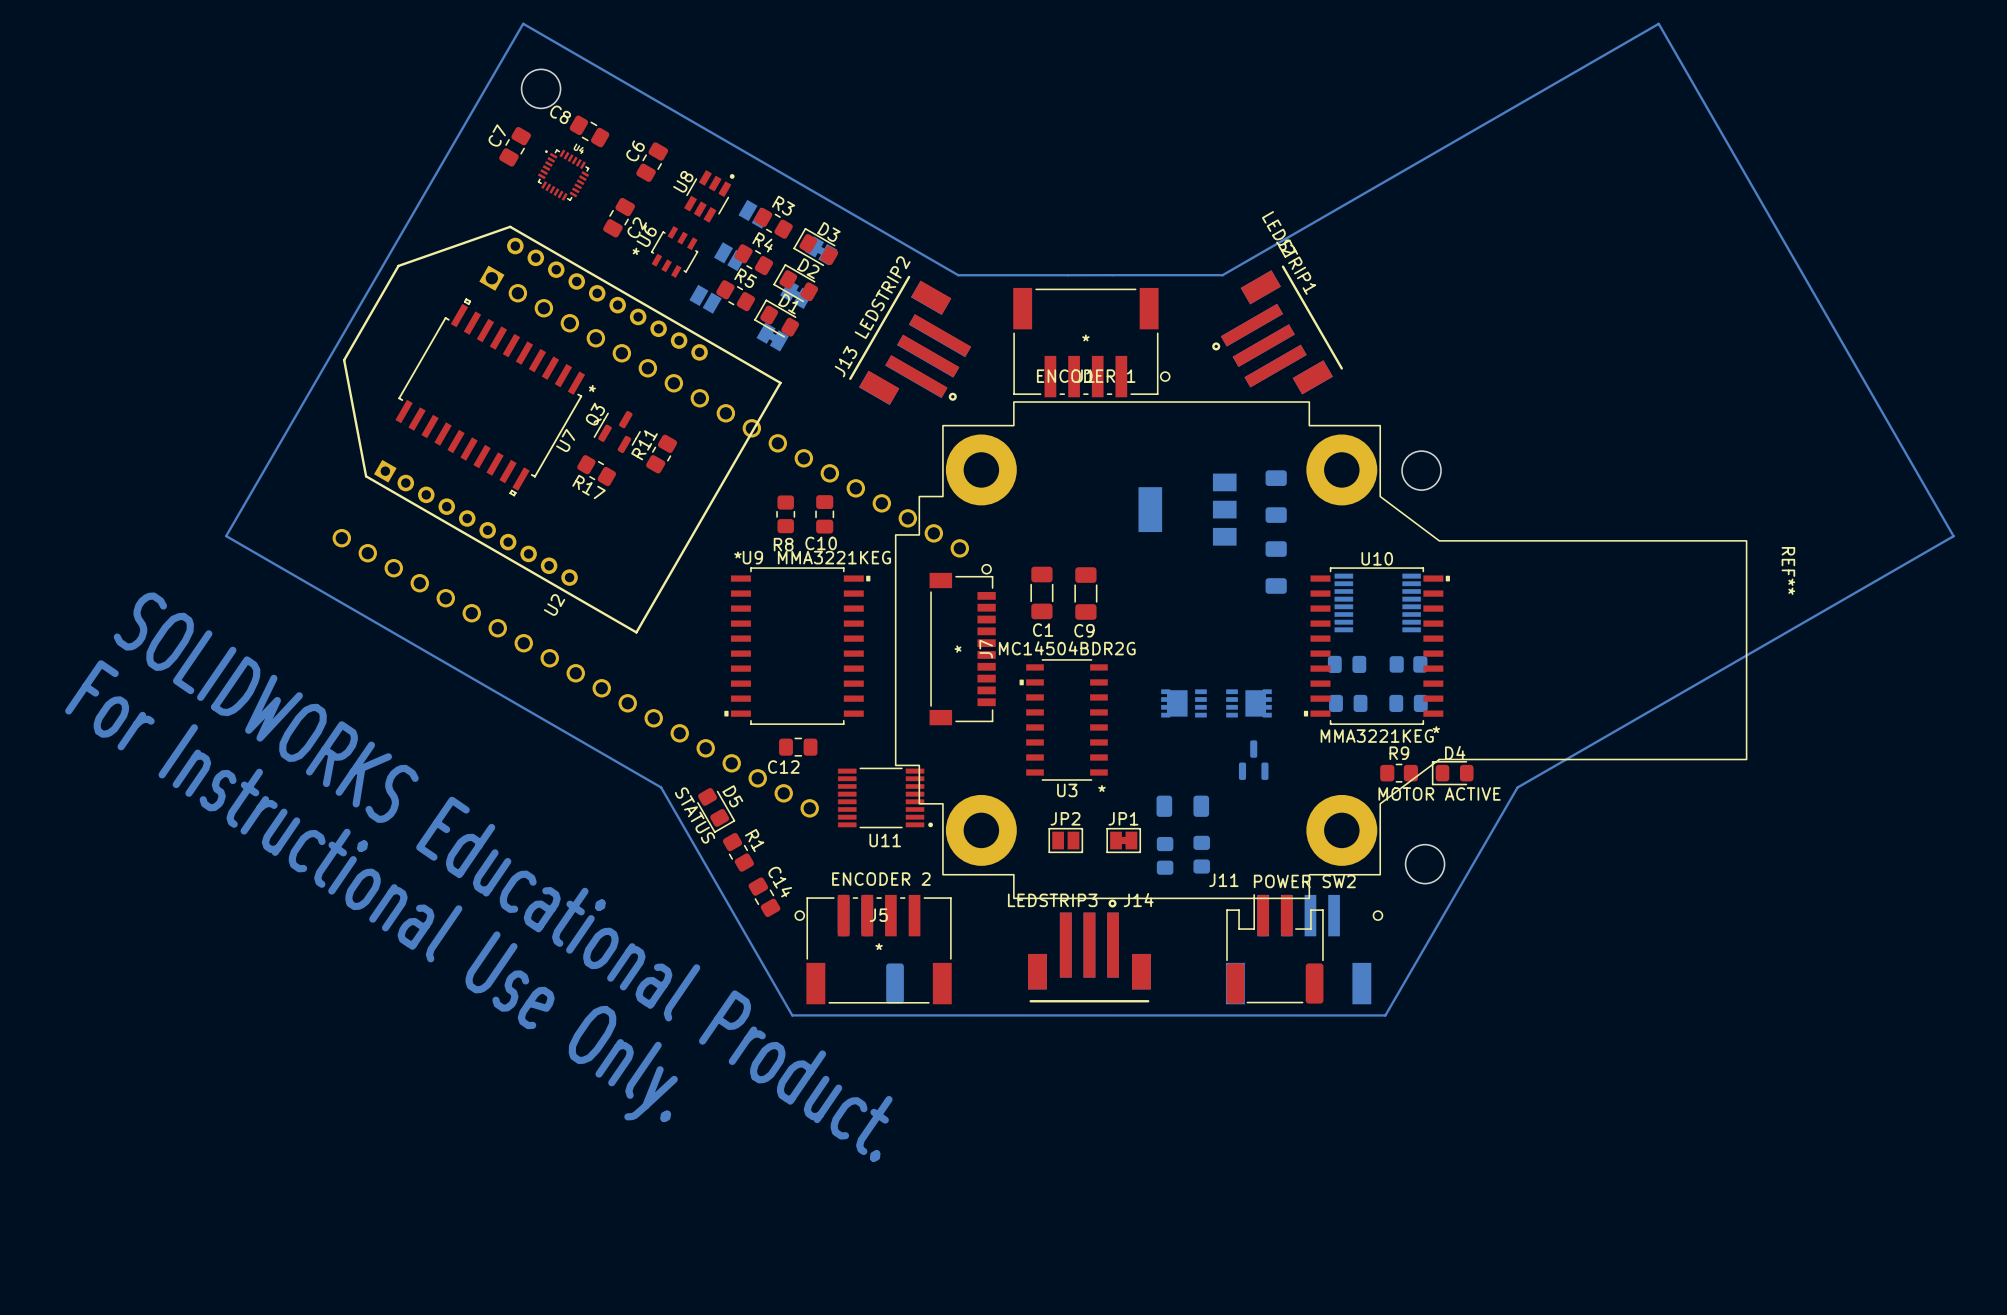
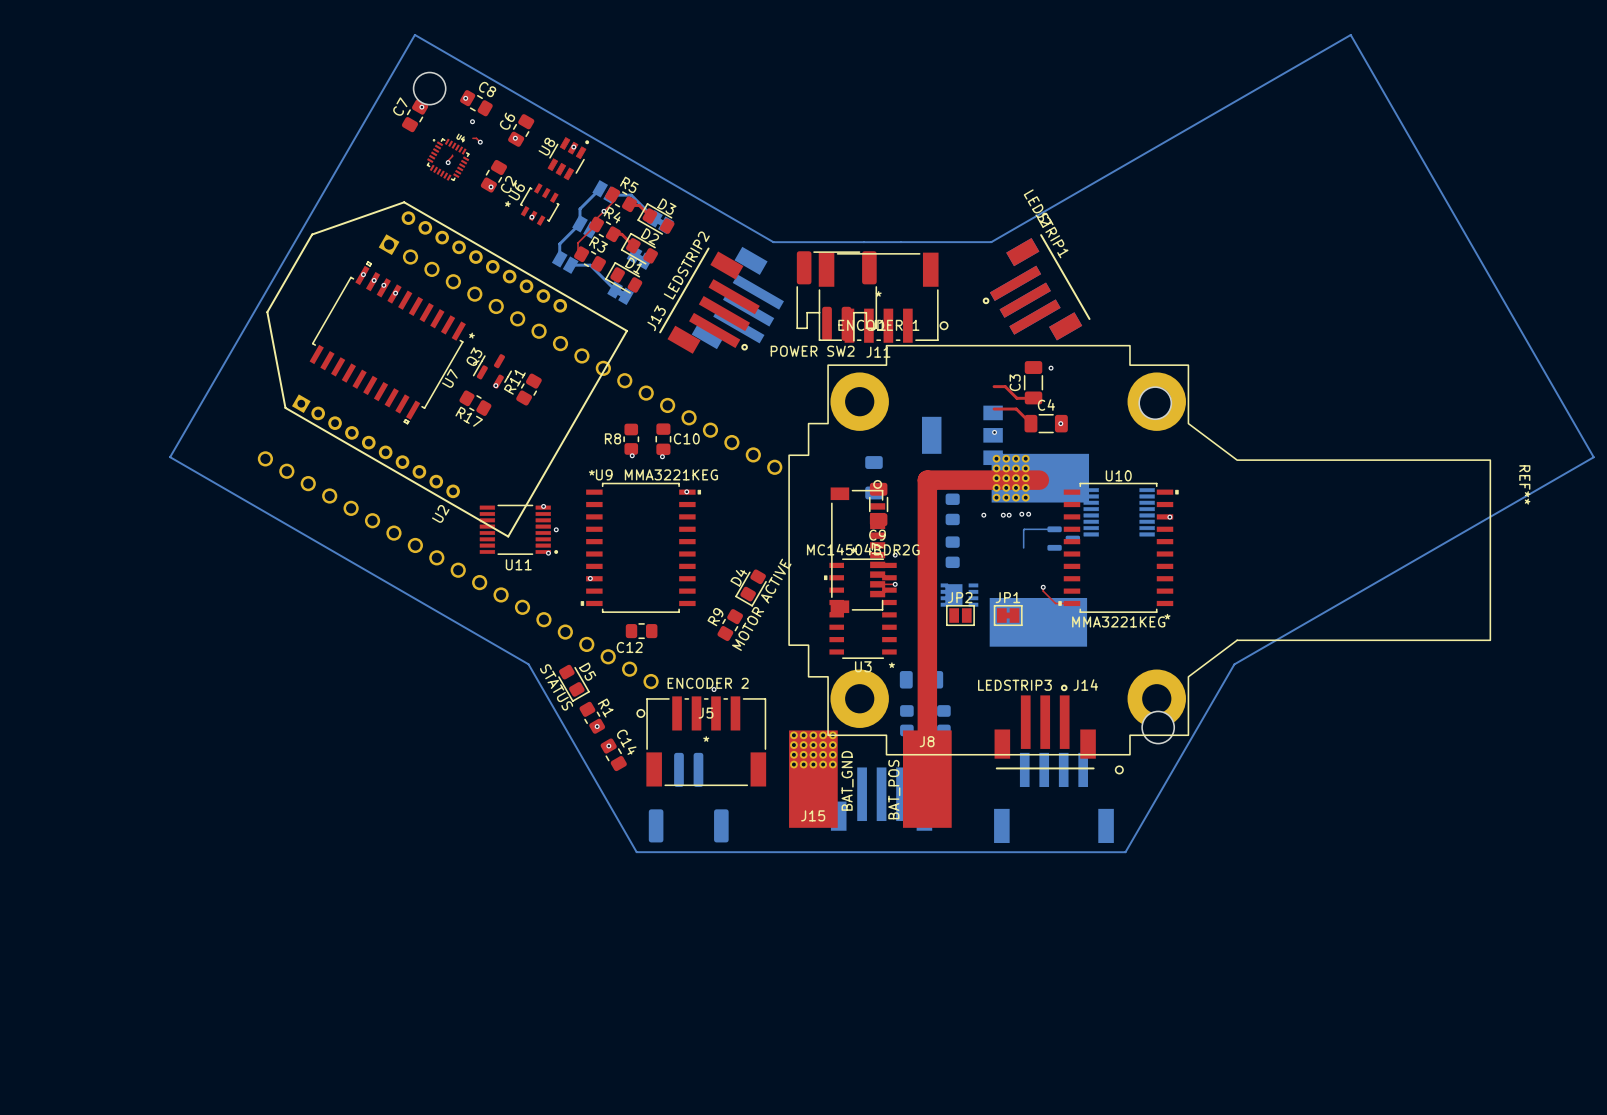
via: none -> (465, 98)
via: none -> (421, 107)
C8 name position: C8 (560, 114) -> C8 (487, 89)
via: none -> (472, 121)
C8 position: (589, 131) -> (476, 103)
C7 position: (515, 146) -> (415, 115)
top track: none -> (472, 138) (476, 138) (480, 142)
via: none -> (515, 138)
via: none -> (480, 142)
via: none -> (573, 147)
C6 position: (652, 162) -> (521, 130)
top track: none -> (452, 155) (448, 162)
via: none -> (448, 162)
U8 position: (709, 196) -> (568, 158)
R3 name: R3 (783, 205) -> R5 (629, 184)
via: none -> (491, 186)
bottom track: none -> (600, 188) (580, 208) (580, 223) (559, 243) (559, 258)
C2 position: (619, 217) -> (493, 176)
bottom track: none -> (611, 195) (631, 195) (655, 218)
top track: none -> (613, 195) (613, 202) (596, 218) (596, 224) (578, 242) (578, 252)
top track: none -> (629, 205) (639, 205) (649, 216)
via: none -> (603, 211)
via: none -> (531, 217)
U6 position: (674, 251) -> (539, 204)
top track: none -> (613, 234) (621, 234) (633, 245)
R5 name: R5 (745, 278) -> R3 (598, 244)
bottom track: none -> (570, 265) (590, 265) (615, 289)
via: none -> (363, 274)
via: none -> (374, 280)
via: none -> (383, 285)
via: none -> (395, 293)
J13 position: (910, 340) -> (709, 300)
via: none -> (1051, 368)
C3: none -> (1033, 382)
via: none -> (495, 385)
top track: none -> (994, 386) (1005, 386) (1016, 398) (1033, 397)
top track: none -> (994, 409) (1016, 409) (1030, 423)
via: none -> (1060, 423)
C4 side: bottom (1276, 496) -> top (1046, 423)
via: none -> (994, 432)
via: none -> (632, 455)
via: none -> (662, 456)
part footprint: [1265, 541, 1287, 594] -> [991, 453, 1090, 503]
C10 name position: C10 (821, 543) -> C10 (686, 438)
R8 name position: R8 (783, 544) -> R8 (612, 438)
top track: none -> (927, 480) (927, 777)
top track: none -> (927, 480) (1039, 480)
via: none -> (686, 491)
C1 side: top (1041, 592) -> bottom (873, 477)
via: none -> (543, 506)
part: none -> (952, 509)
via: none -> (1021, 514)
via: none -> (1028, 514)
via: none -> (983, 515)
via: none -> (1003, 515)
via: none -> (1009, 515)
via: none -> (1169, 517)
bottom track: none -> (1054, 529) (1024, 529) (1023, 547)
via: none -> (556, 529)
J7 position: (962, 644) -> (857, 546)
REF** position: (1321, 650) -> (1139, 550)
part: none -> (952, 552)
via: none -> (548, 553)
via: none -> (895, 555)
part: (1347, 664) -> none
part: (1408, 664) -> none
via: none -> (590, 578)
top track: none -> (877, 584) (895, 584)
via: none -> (895, 584)
top track: none -> (1043, 587) (1043, 591) (1055, 603) (1071, 603)
via: none -> (1043, 587)
part: (1248, 703) -> none
part: (1348, 703) -> none
part: (1408, 703) -> none
part: none -> (1038, 622)
part rotation: 0° (1253, 760) -> 90° clockwise (1063, 538)
part position: (1253, 760) -> (1063, 538)
R9 rotation: 0° (1399, 773) -> 60° counterclockwise (730, 625)
R9 position: (1399, 773) -> (730, 625)
D4 rotation: 0° (1452, 773) -> 60° counterclockwise (751, 587)
D4 position: (1452, 773) -> (751, 587)
U11 position: (885, 797) -> (518, 529)
part position: (1182, 806) -> (921, 679)
via: none -> (714, 689)
JP2 position: (1065, 840) -> (960, 615)
JP1 position: (1123, 840) -> (1008, 615)
part position: (1201, 854) -> (906, 720)
via: none -> (597, 726)
text: SOLIDWORKS Educational Product. (503, 877) -> none
via: none -> (608, 746)
text: For Instructional Use Only. (371, 891) -> none
J15: none -> BAT_GND (813, 779)
J8: none -> BAT_POS (927, 779)
J11 rotation: 0° (1274, 948) -> 180° (836, 296)
J11 position: (1274, 948) -> (836, 296)
J5 position: (873, 949) -> (701, 741)
J14 position: (1089, 950) -> (1045, 726)

